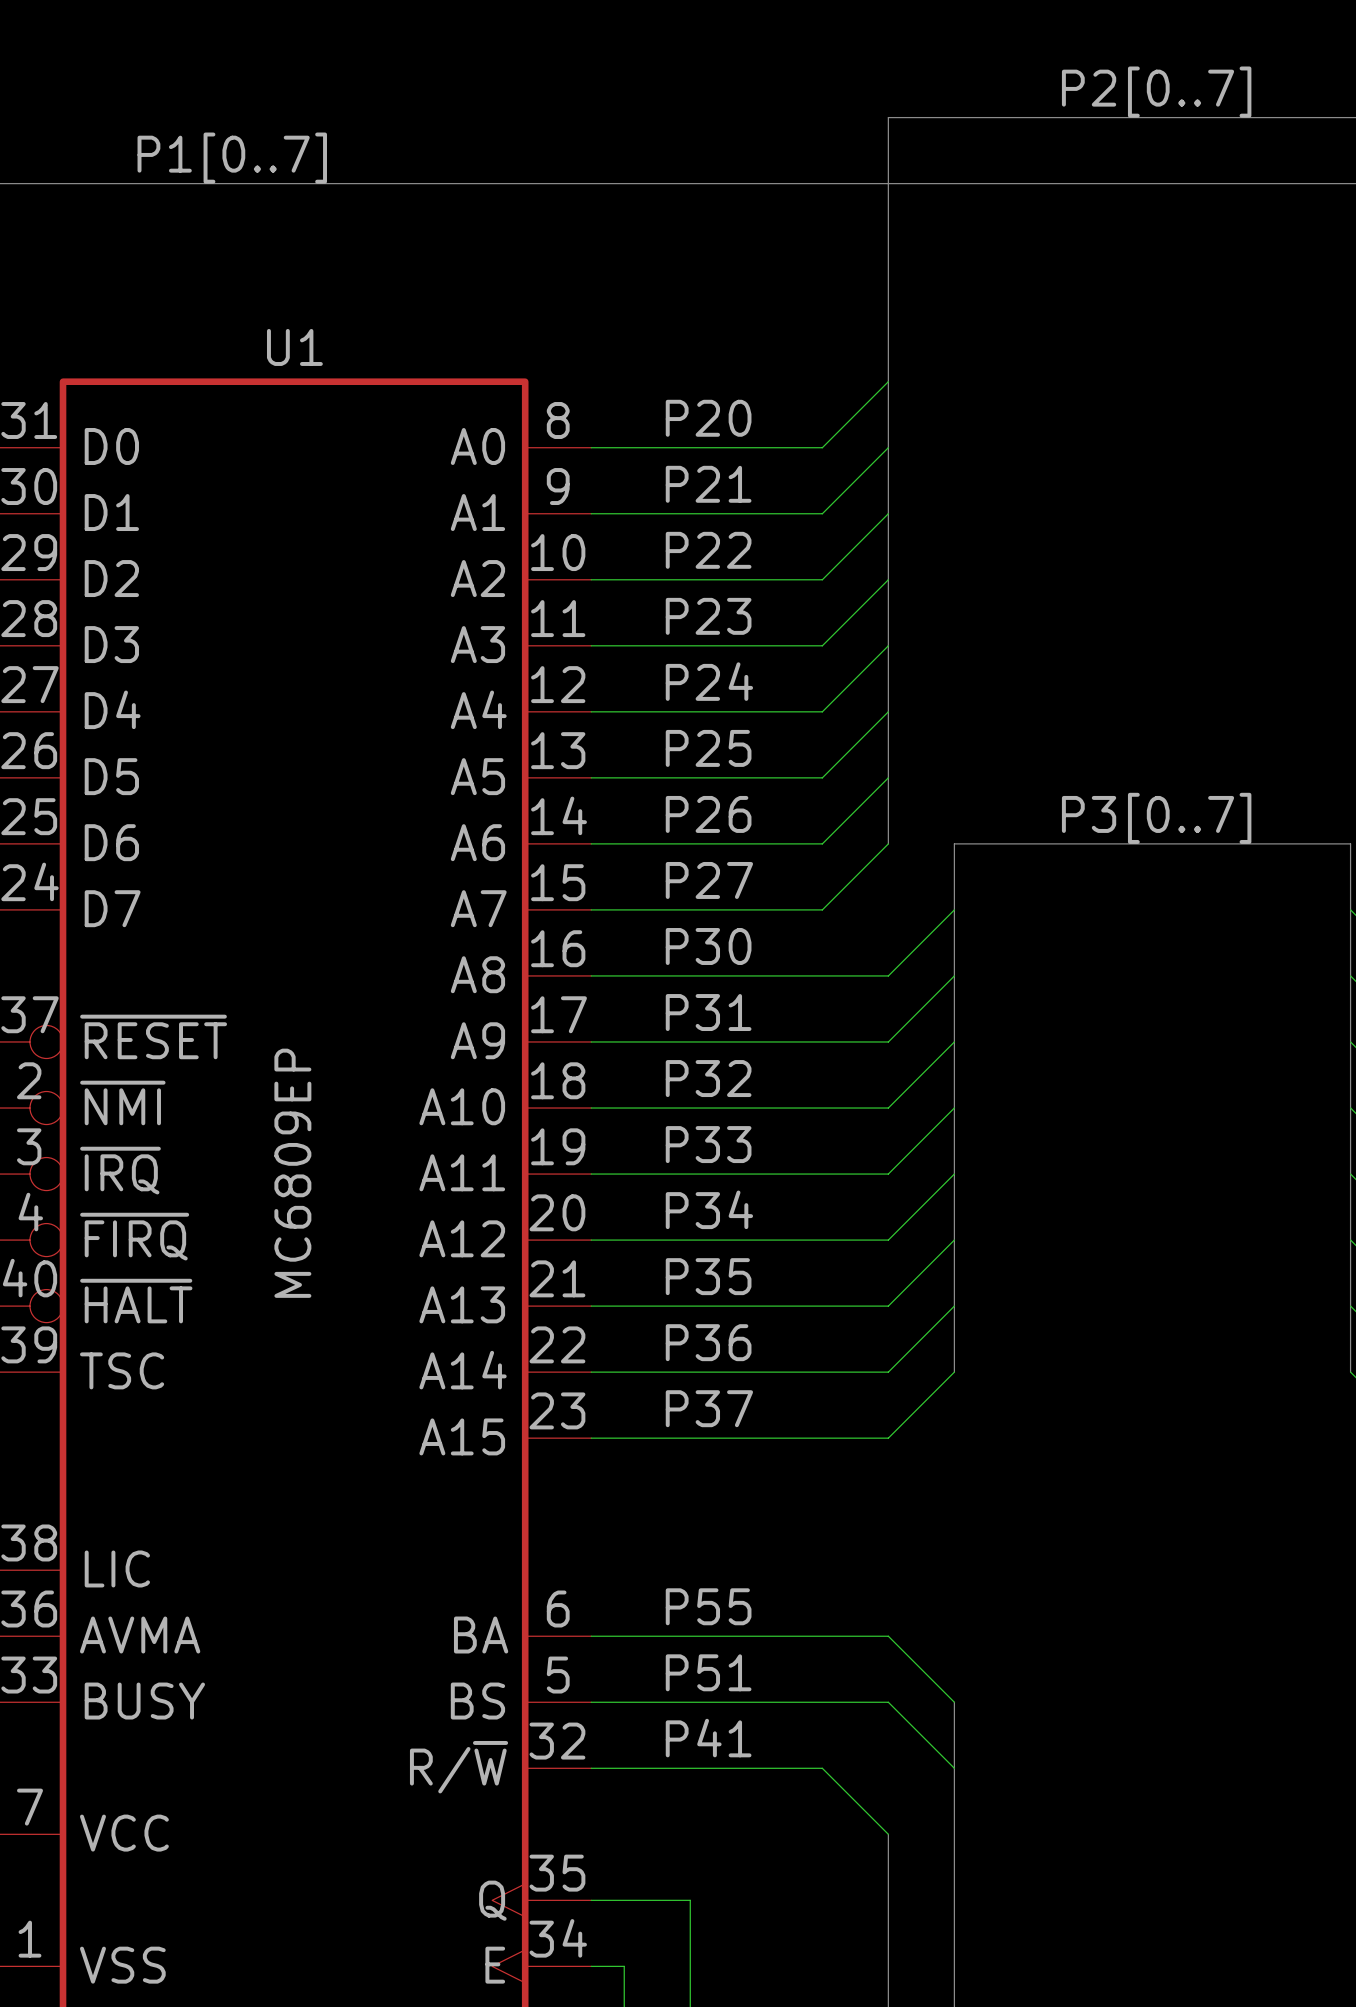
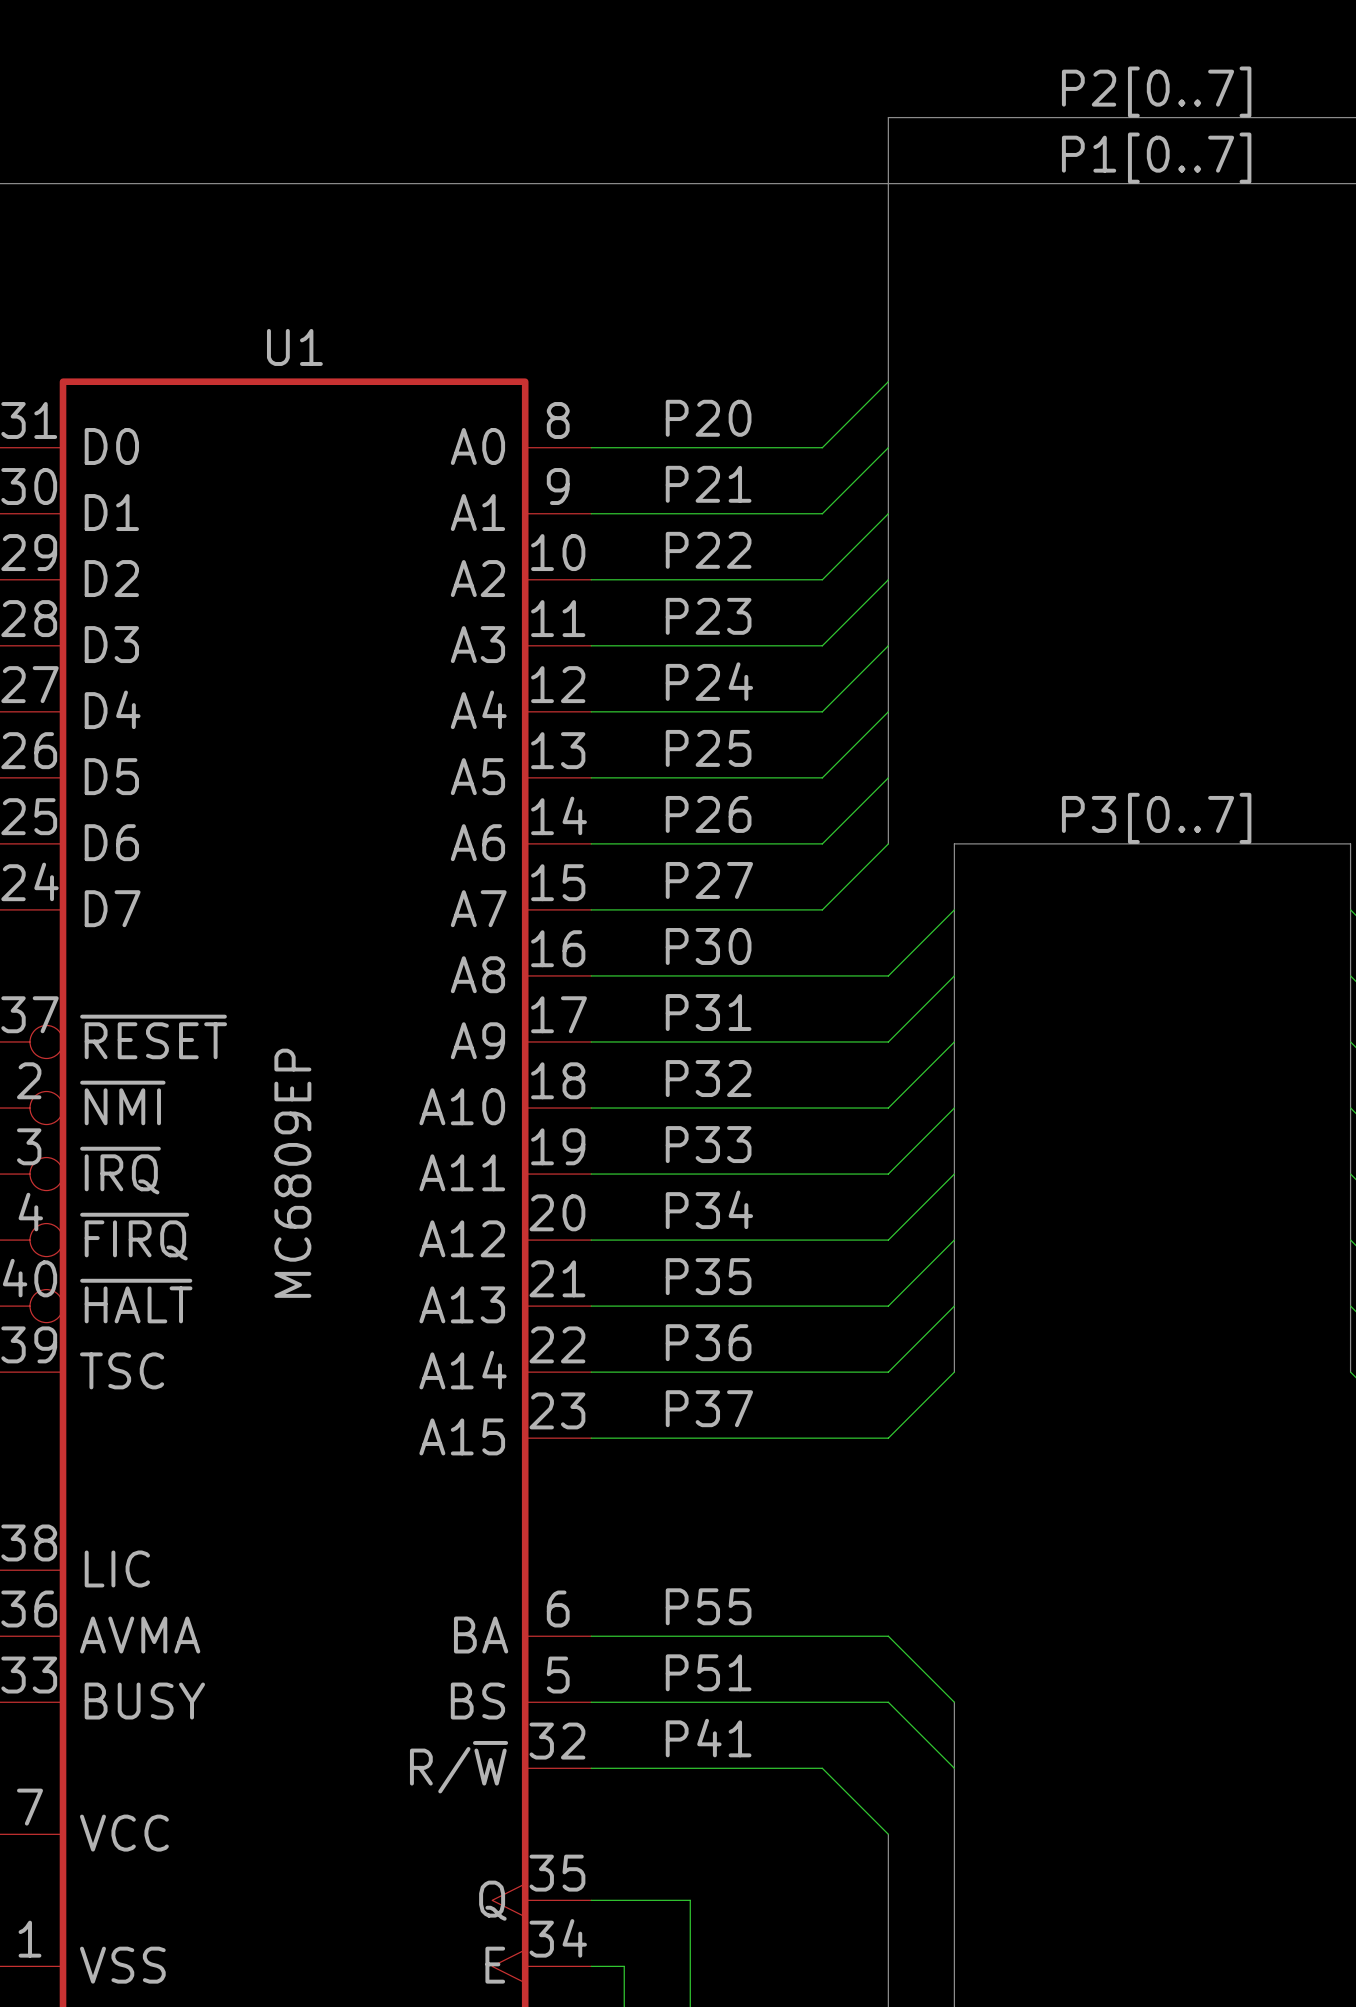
label: P1[0..7] (232, 158) -> none
label: none -> P1[0..7] (1156, 158)

